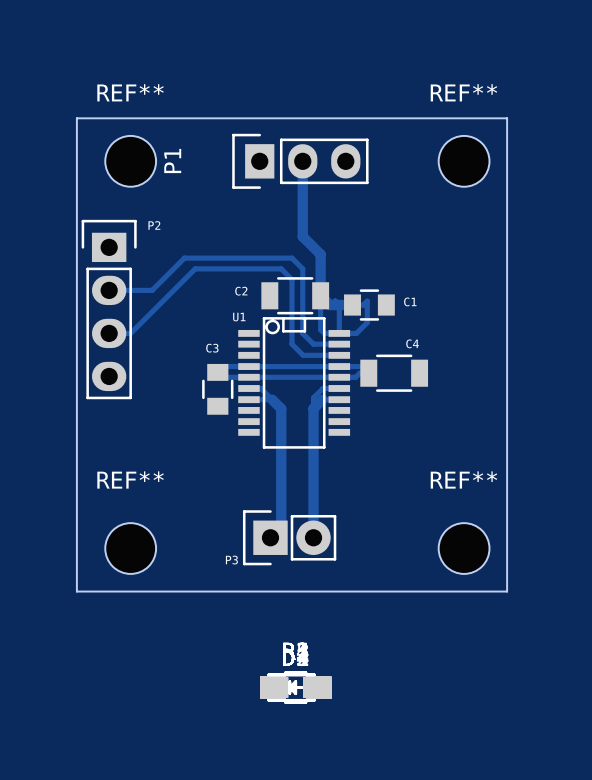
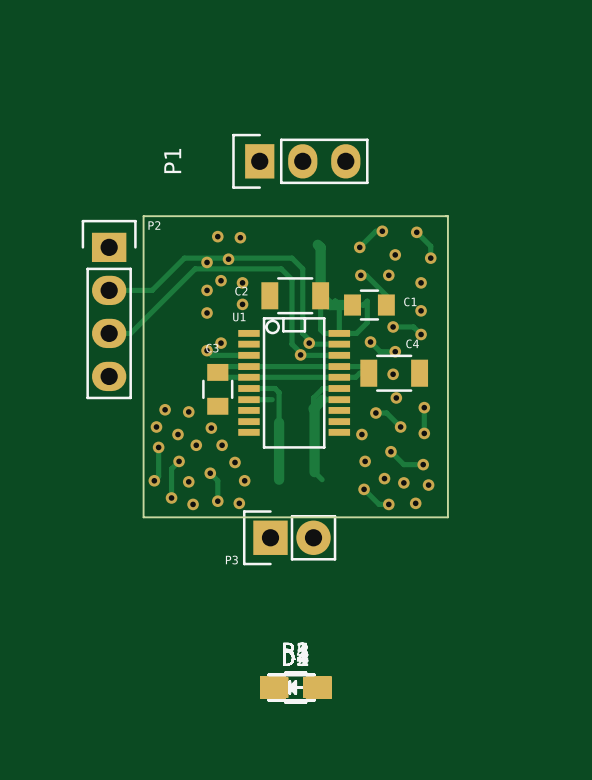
board edge: (76, 118) (76, 591) (507, 591) (507, 118) (76, 118) -> none
REF**: (130, 161) -> none
track: (302, 161) (302, 236) (320, 254) -> (317, 244) (320, 247) (320, 254)
REF**: (464, 161) -> none
board edge: none -> (143, 216) (447, 216) (447, 517) (143, 517) (143, 216)
track: none -> (382, 231) (375, 231) (359, 247)
via: none -> (382, 231)
track: none -> (416, 232) (430, 246) (430, 258)
via: none -> (416, 232)
via: none -> (217, 236)
via: none -> (240, 237)
via: none -> (359, 247)
via: none -> (395, 254)
via: none -> (430, 258)
via: none -> (228, 259)
via: none -> (207, 262)
track: none -> (360, 275) (366, 275) (386, 295) (386, 305)
via: none -> (360, 275)
via: none -> (388, 275)
via: none -> (221, 280)
via: none -> (242, 282)
via: none -> (421, 282)
via: none -> (207, 290)
via: none -> (242, 304)
via: none -> (421, 310)
via: none -> (207, 312)
track: none -> (393, 326) (413, 326) (421, 334)
via: none -> (393, 326)
via: none -> (421, 334)
track: none -> (370, 342) (380, 351) (395, 351)
via: none -> (370, 342)
via: none -> (221, 343)
via: none -> (309, 343)
track: none -> (207, 350) (211, 355) (248, 355)
via: none -> (207, 350)
via: none -> (395, 351)
via: none -> (300, 354)
via: none -> (393, 374)
track: (261, 388) (281, 408) (281, 527) (270, 537) -> (261, 388) (275, 388) (279, 392) (279, 479)
via: none -> (396, 397)
track: none -> (424, 407) (424, 433)
via: none -> (424, 407)
track: (313, 408) (313, 537) -> none
via: none -> (165, 409)
track: none -> (314, 409) (314, 472) (322, 479)
via: none -> (188, 411)
track: none -> (375, 413) (386, 413) (400, 426)
via: none -> (375, 413)
via: none -> (156, 426)
via: none -> (400, 426)
via: none -> (211, 428)
via: none -> (424, 433)
via: none -> (178, 434)
via: none -> (361, 434)
via: none -> (196, 445)
via: none -> (222, 445)
track: none -> (158, 447) (158, 476) (154, 480)
via: none -> (158, 447)
track: none -> (390, 451) (403, 464) (423, 464)
via: none -> (390, 451)
track: none -> (179, 461) (171, 468) (171, 497)
via: none -> (179, 461)
via: none -> (365, 461)
via: none -> (235, 462)
via: none -> (423, 464)
track: none -> (210, 473) (217, 480) (217, 501)
via: none -> (210, 473)
via: none -> (384, 478)
via: none -> (154, 480)
via: none -> (244, 480)
via: none -> (188, 481)
via: none -> (403, 482)
via: none -> (428, 485)
track: none -> (364, 489) (379, 504) (388, 504)
via: none -> (364, 489)
via: none -> (171, 497)
via: none -> (217, 501)
via: none -> (239, 503)
via: none -> (415, 503)
via: none -> (193, 504)
via: none -> (388, 504)
REF**: (130, 548) -> none
REF**: (464, 548) -> none

